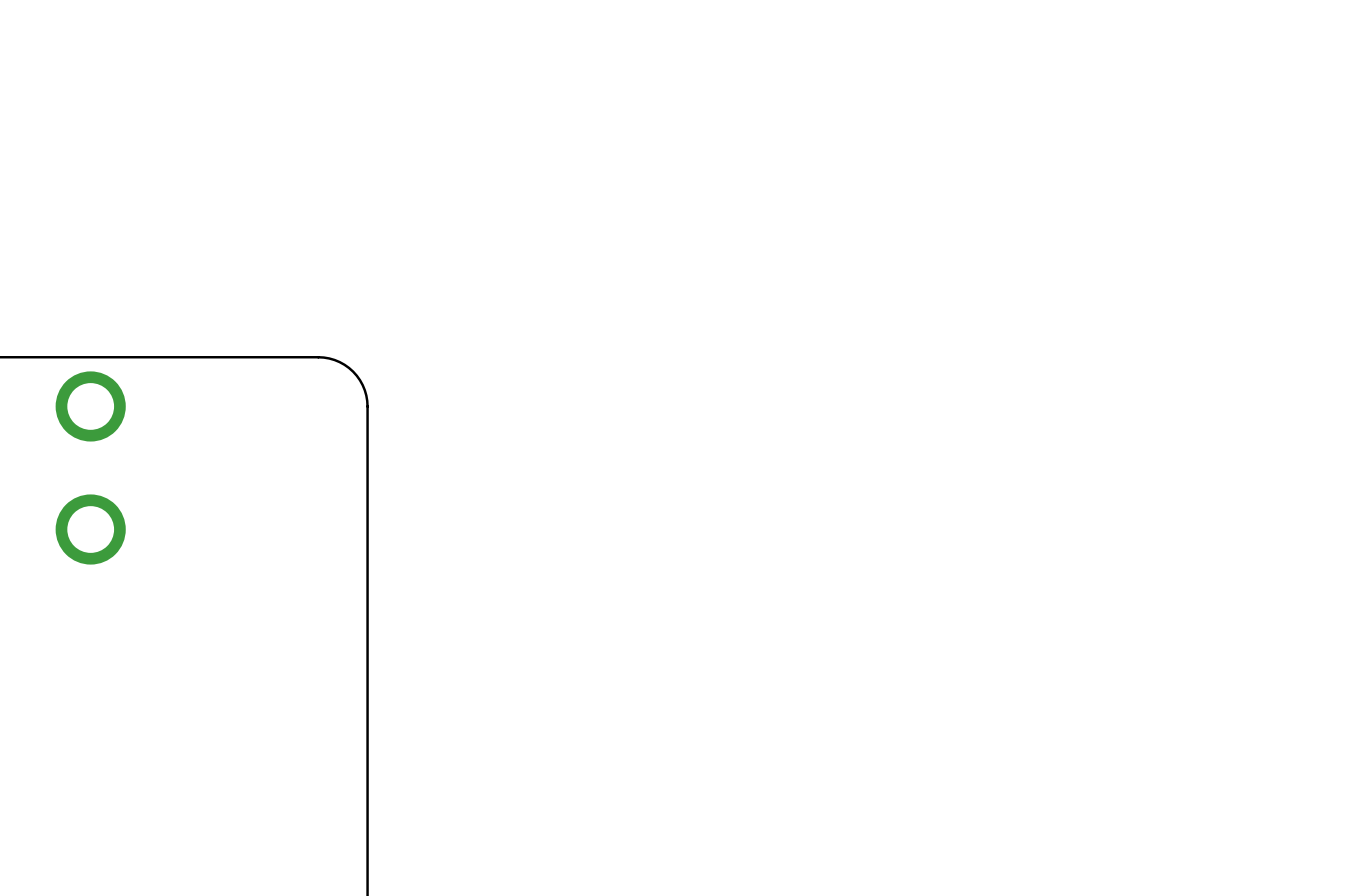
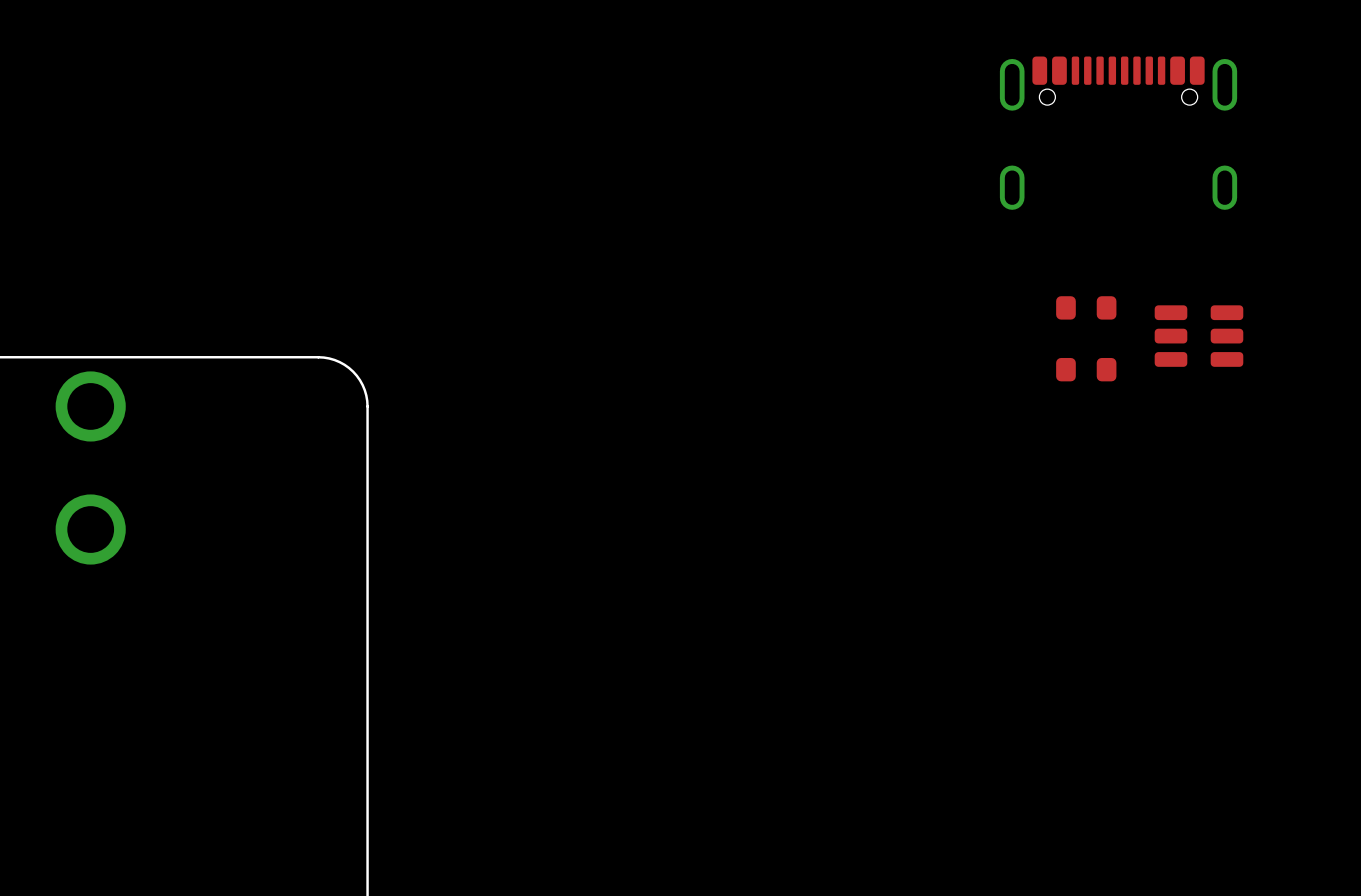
part: none -> (1118, 133)
part: none -> (1086, 307)
part: none -> (1198, 336)
part: none -> (1086, 369)

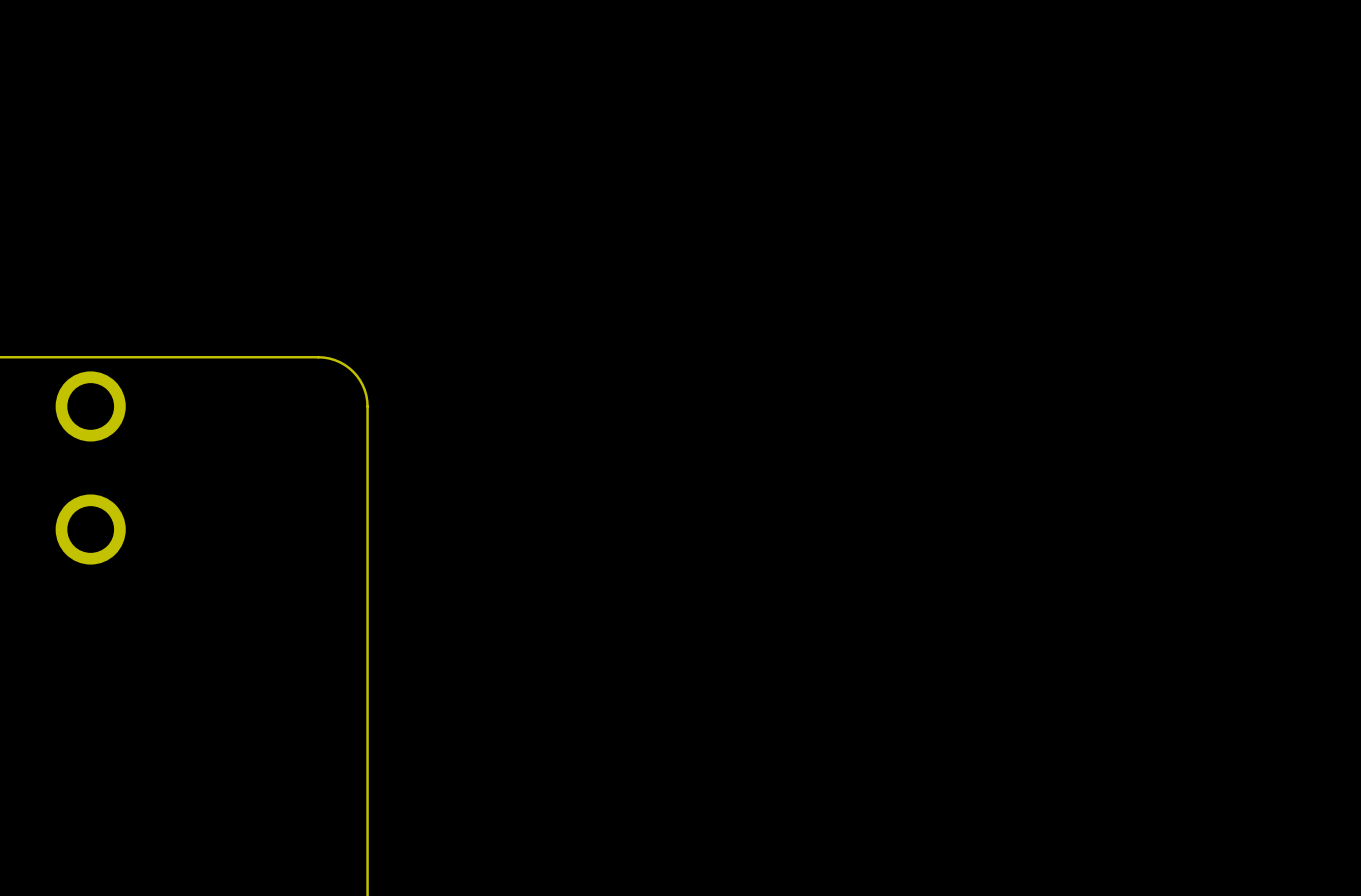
part: (1118, 133) -> none
part: (1086, 307) -> none
part: (1198, 336) -> none
part: (1086, 369) -> none

